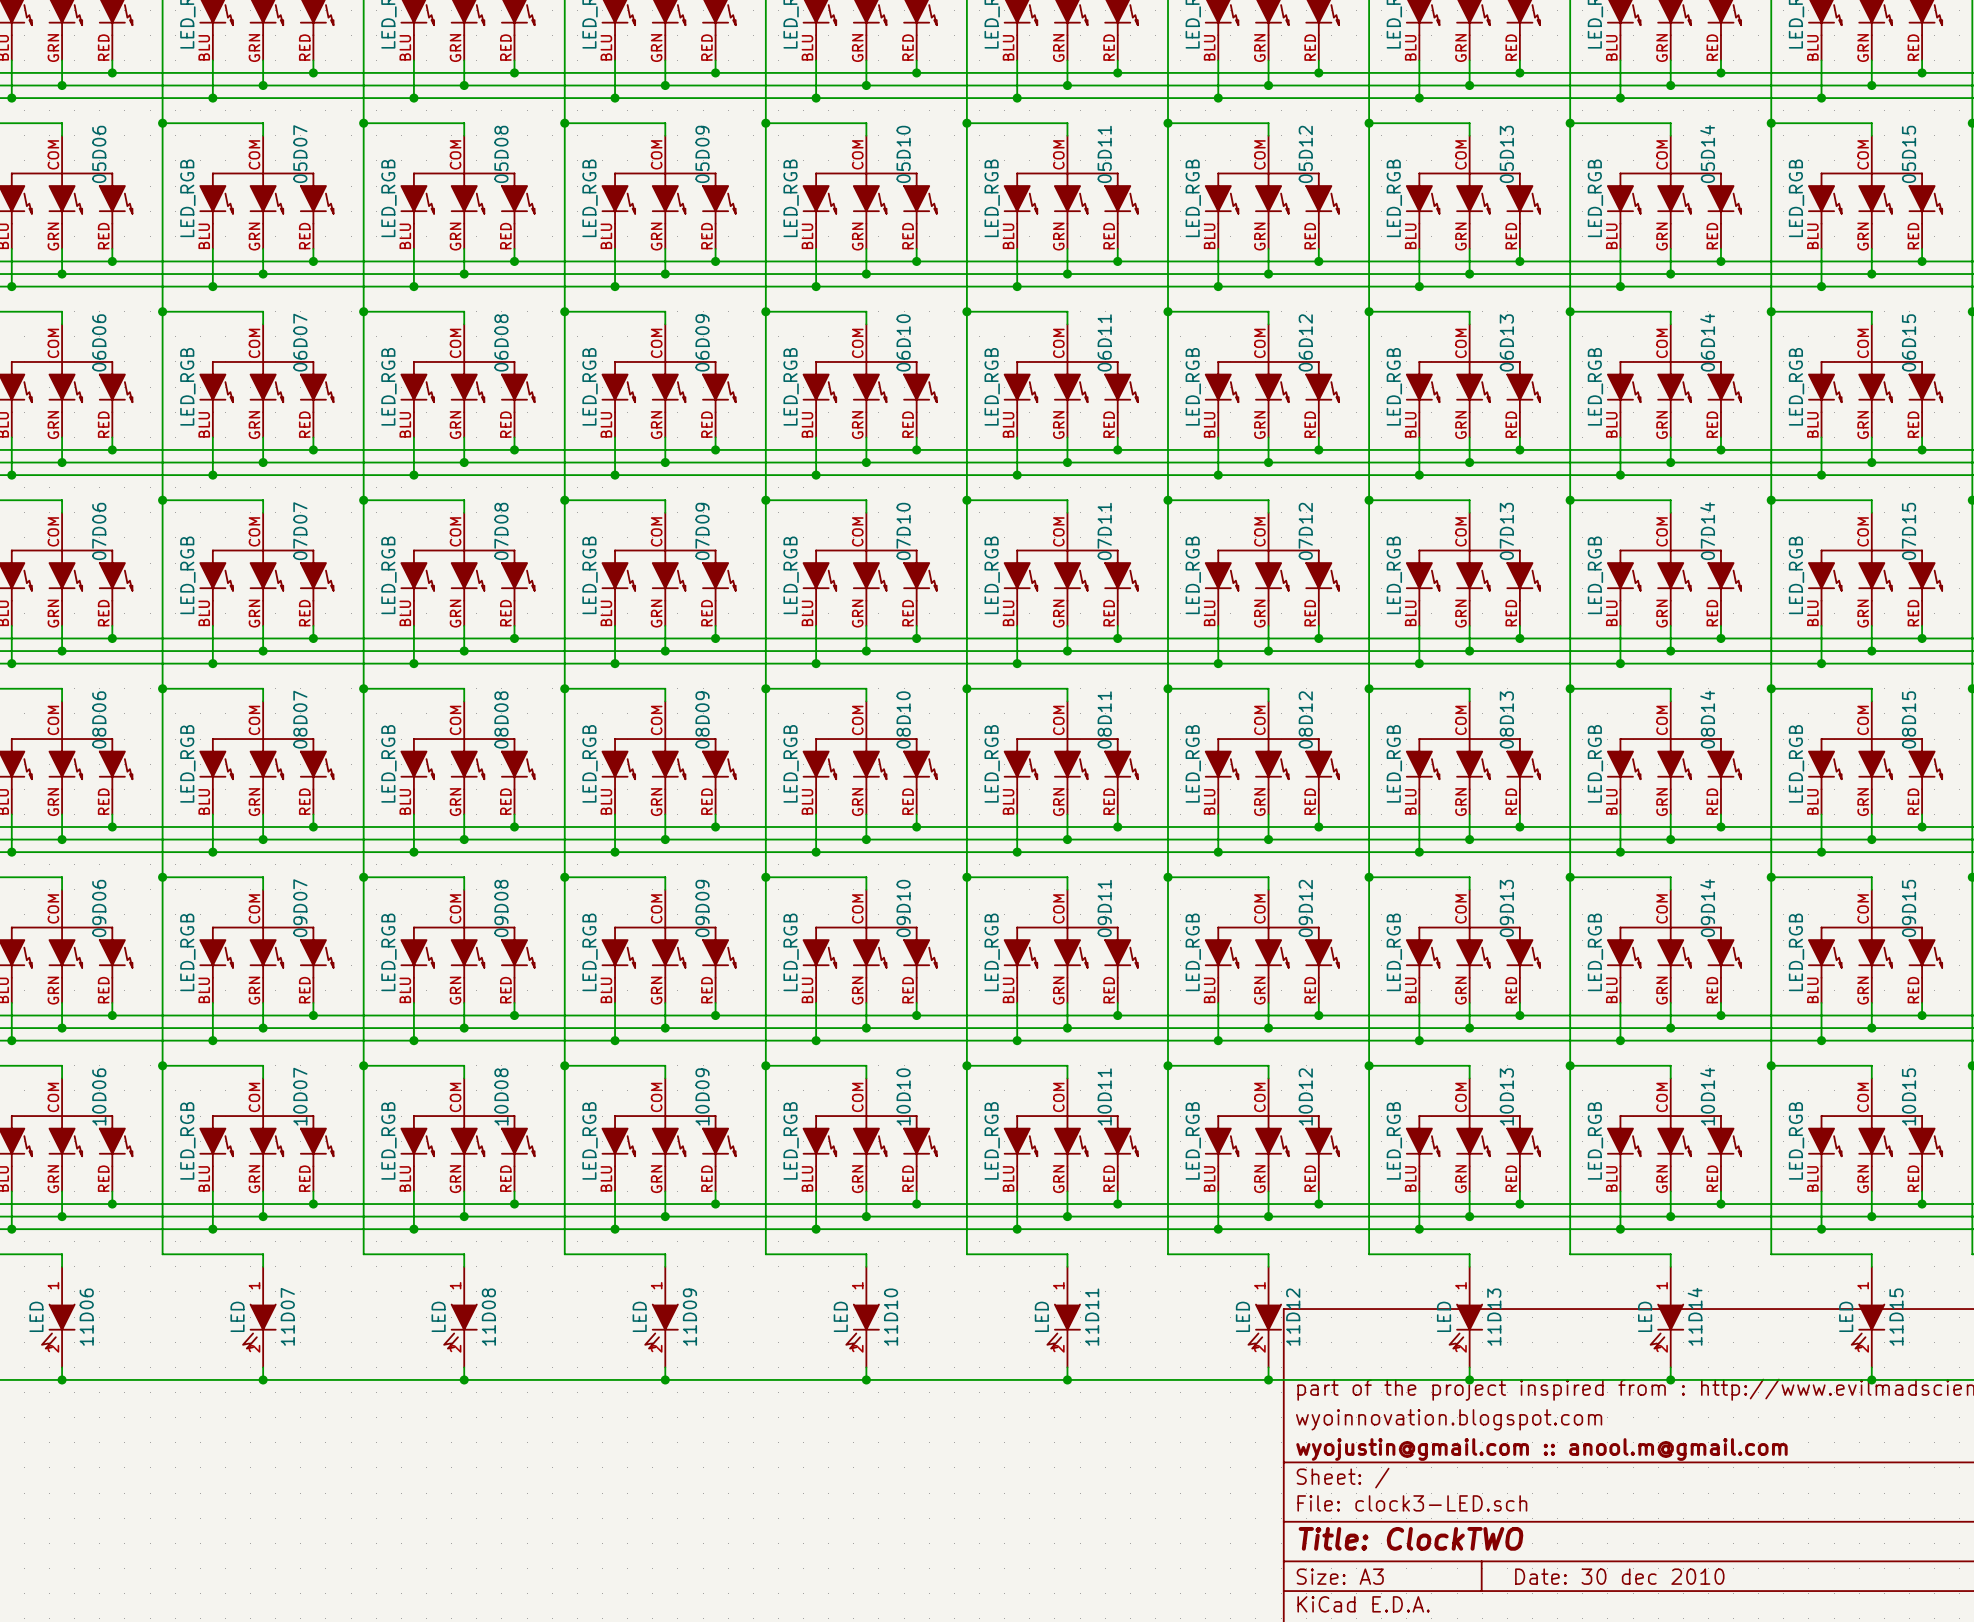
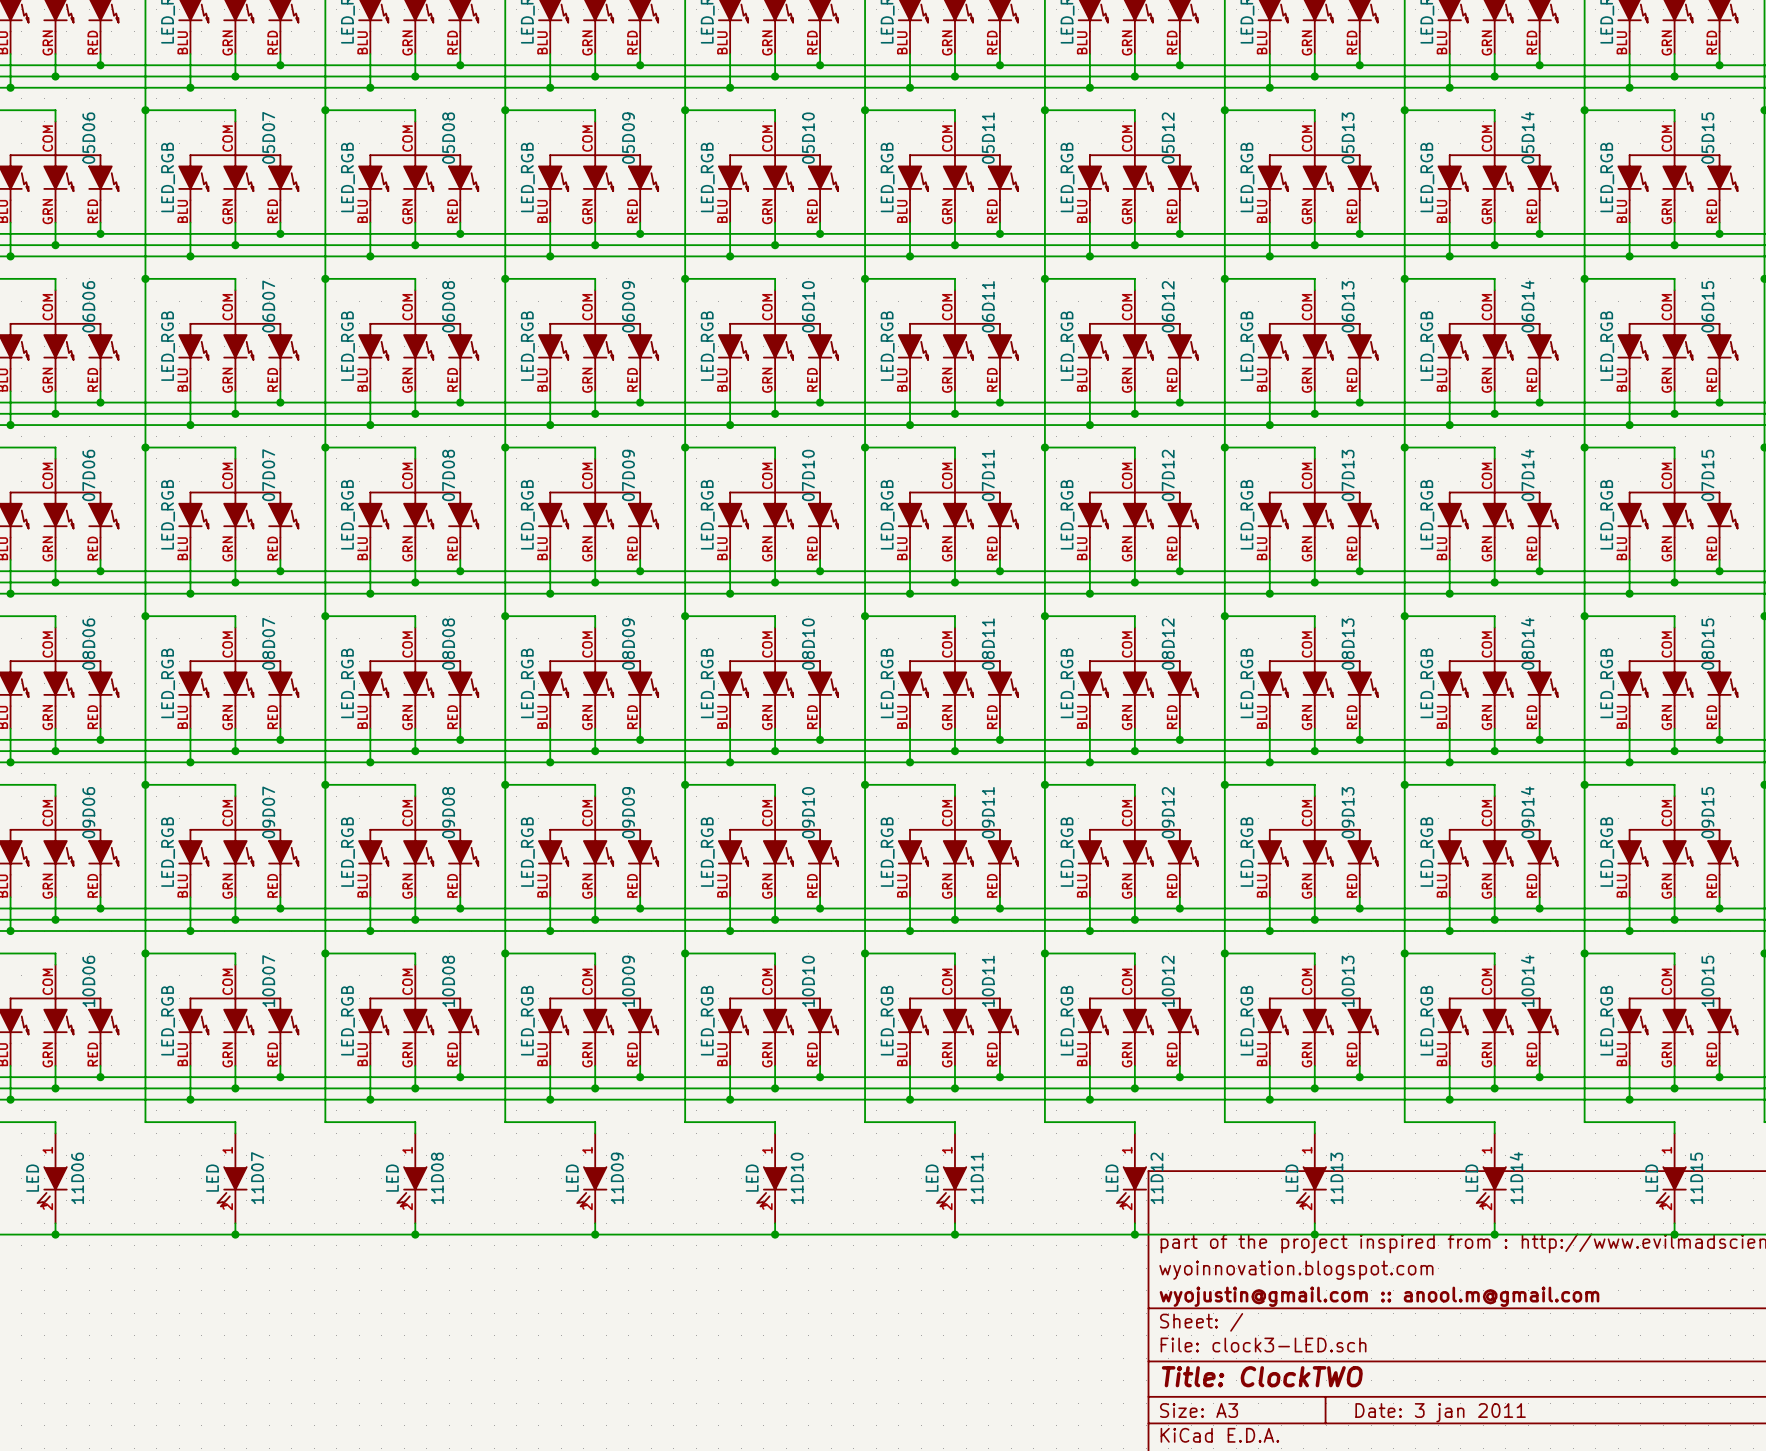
title block: Date: 30 dec 2010 (1619, 1576) -> Date: 3 jan 2011 (1440, 1412)

